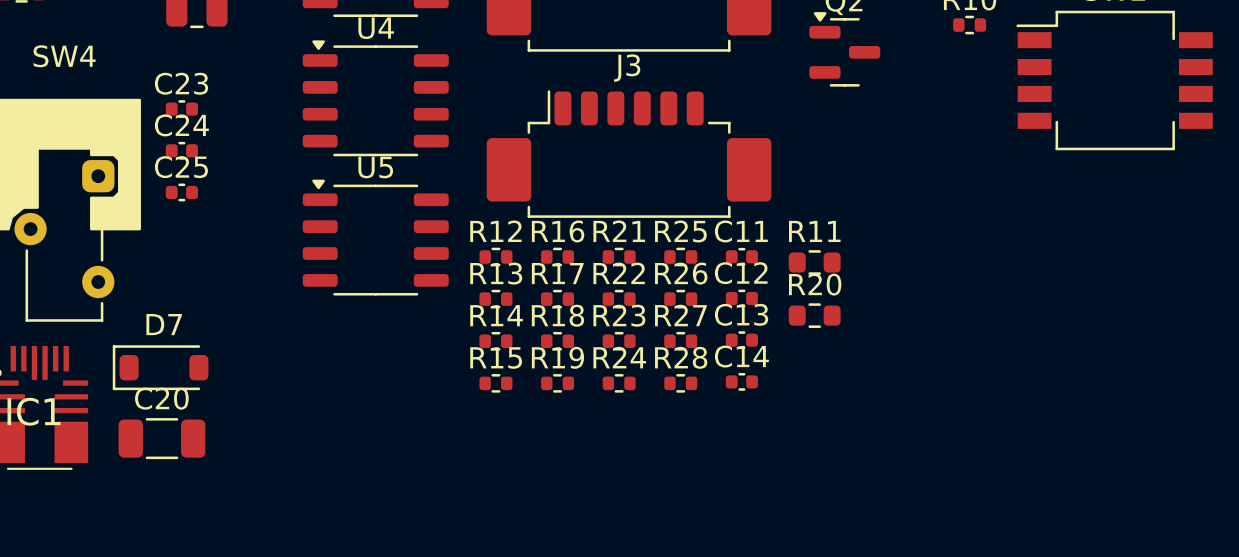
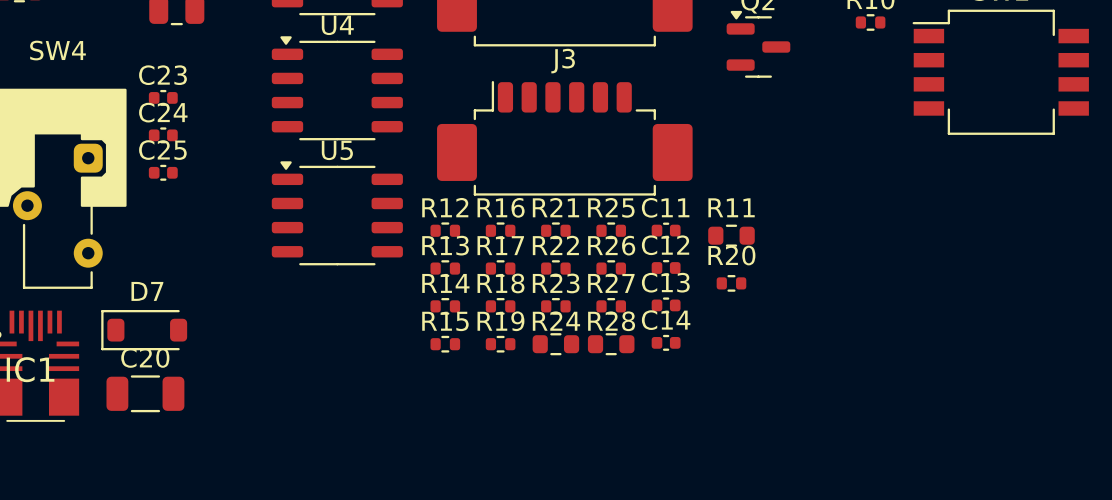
R20 footprint: [788, 303, 841, 328] -> [716, 275, 747, 292]
R24 footprint: [602, 374, 636, 393] -> [532, 333, 580, 356]
R28 footprint: [664, 374, 698, 393] -> [587, 333, 635, 356]

